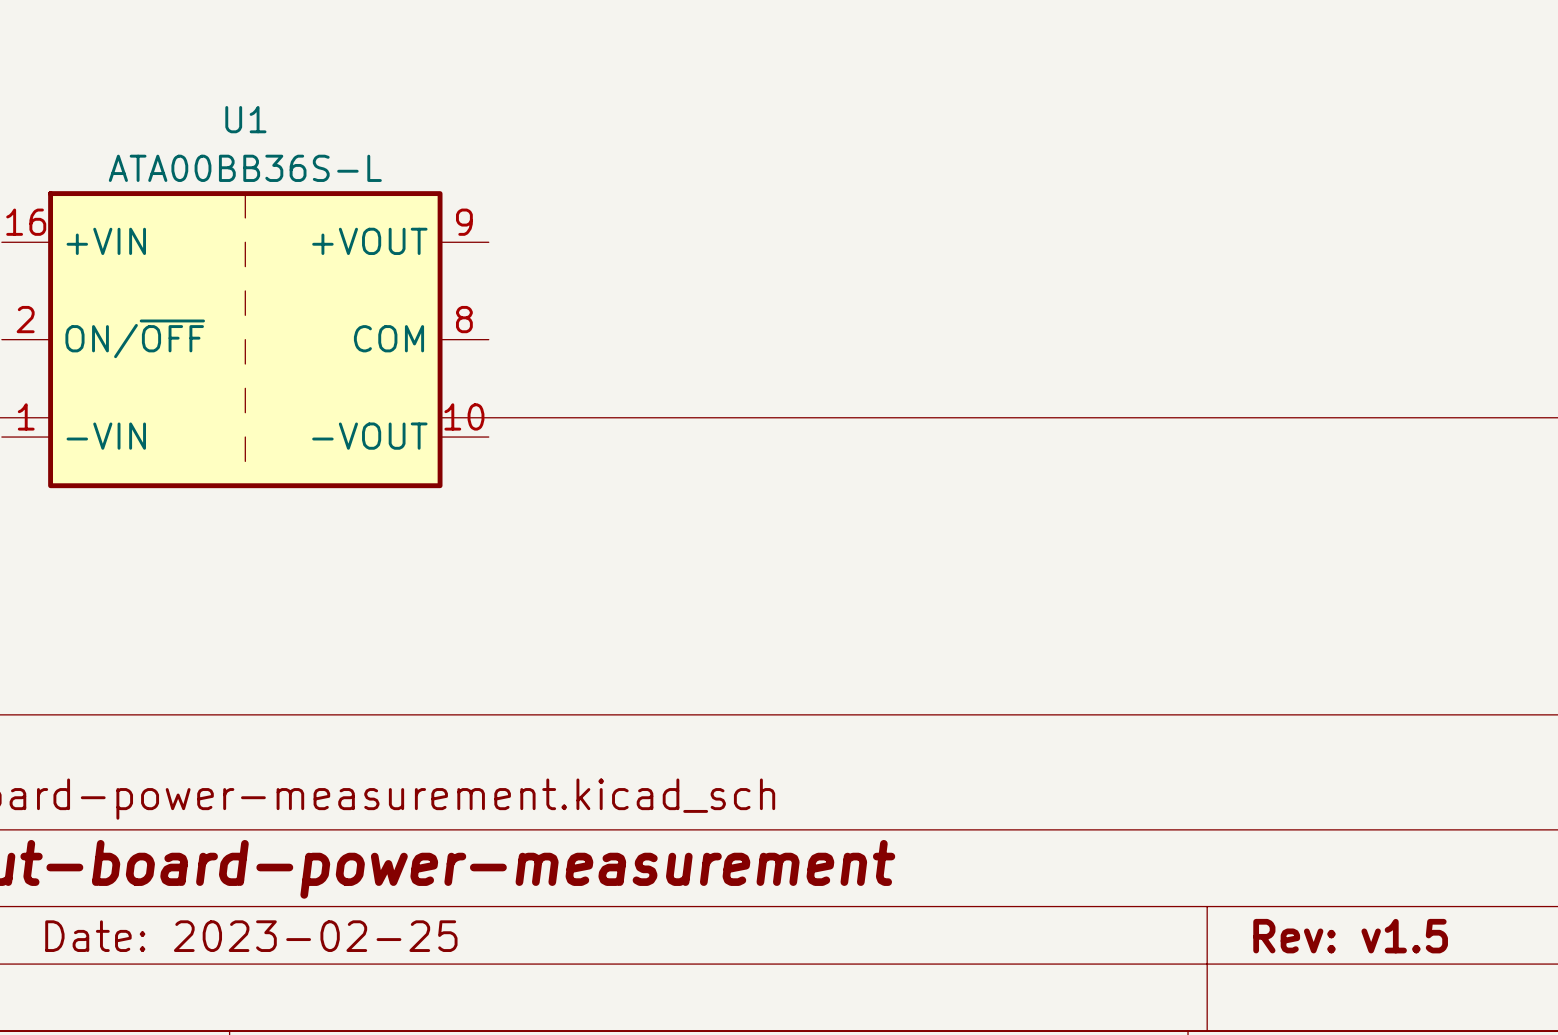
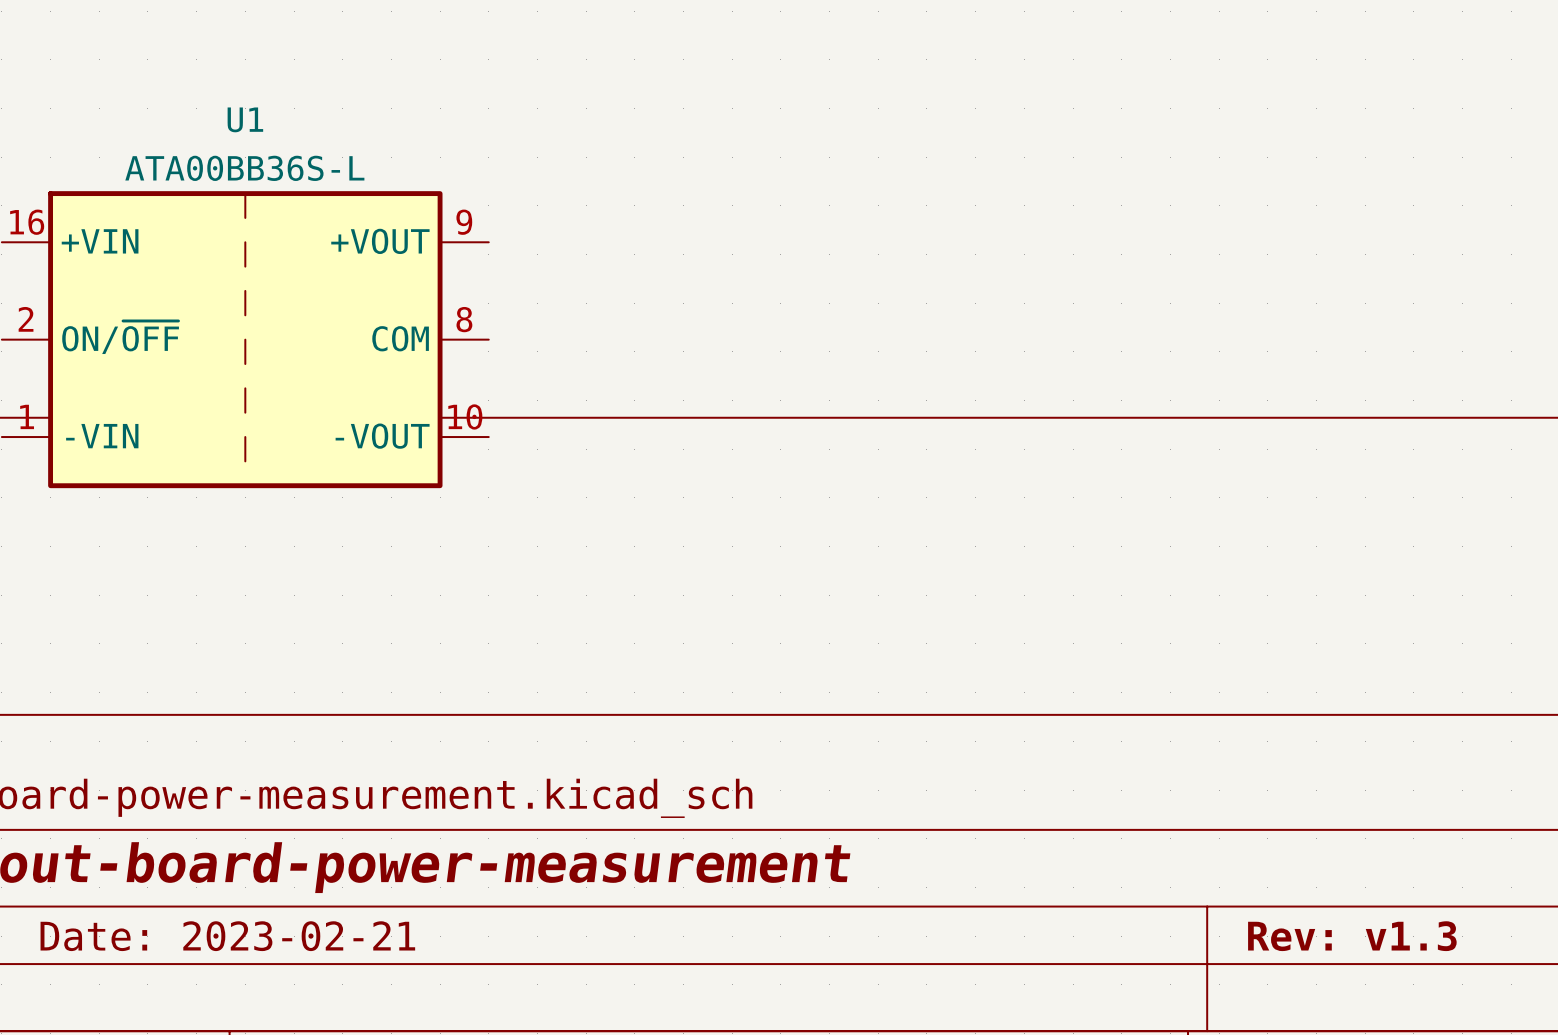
title block: Date: 2023-02-25 (251, 936) -> Date: 2023-02-21 (227, 936)
title block: Rev: v1.5 (1350, 936) -> Rev: v1.3 (1352, 936)

